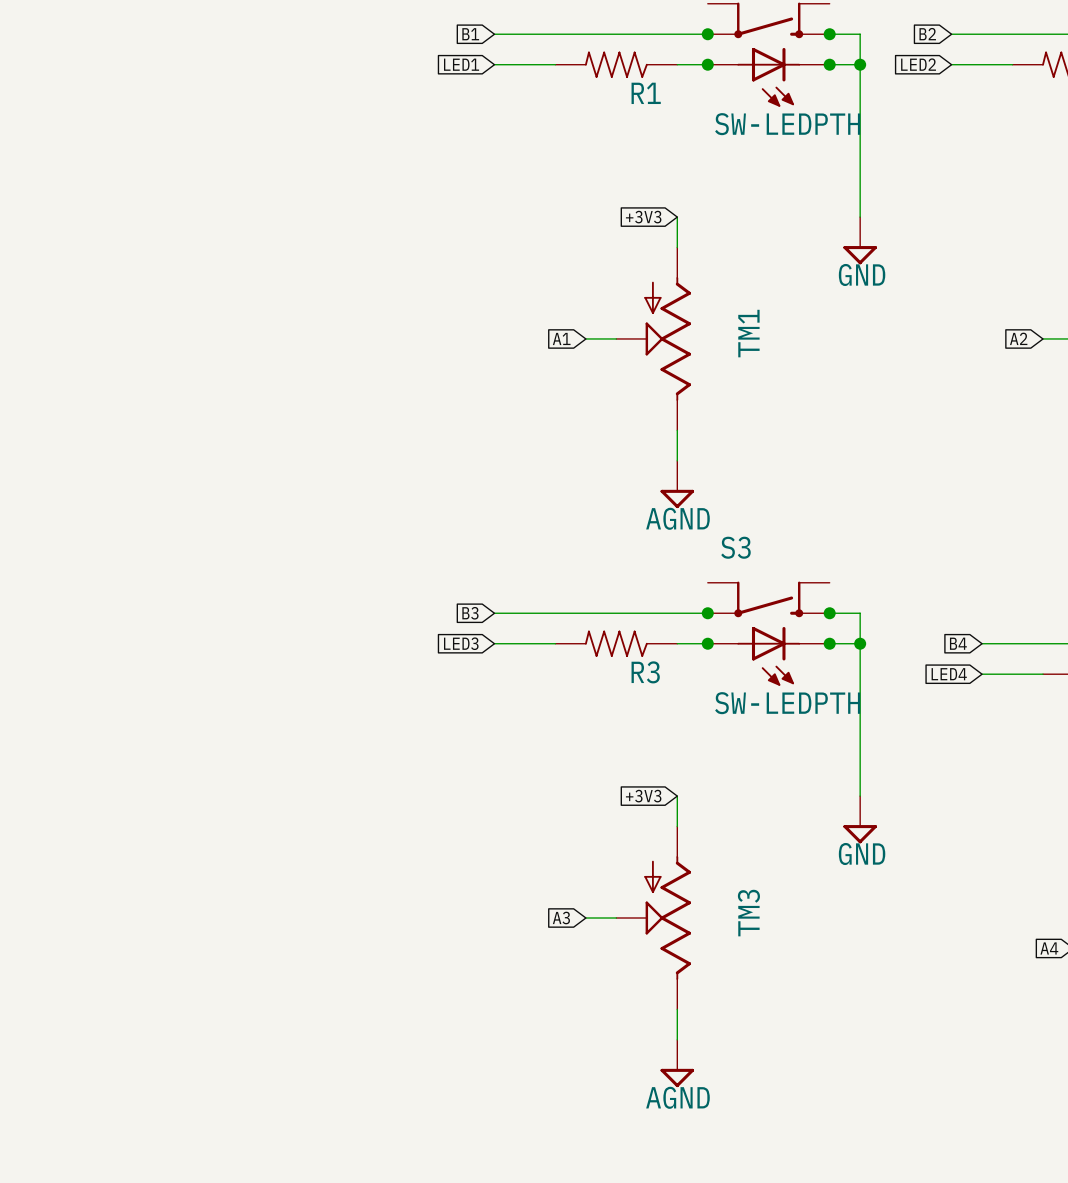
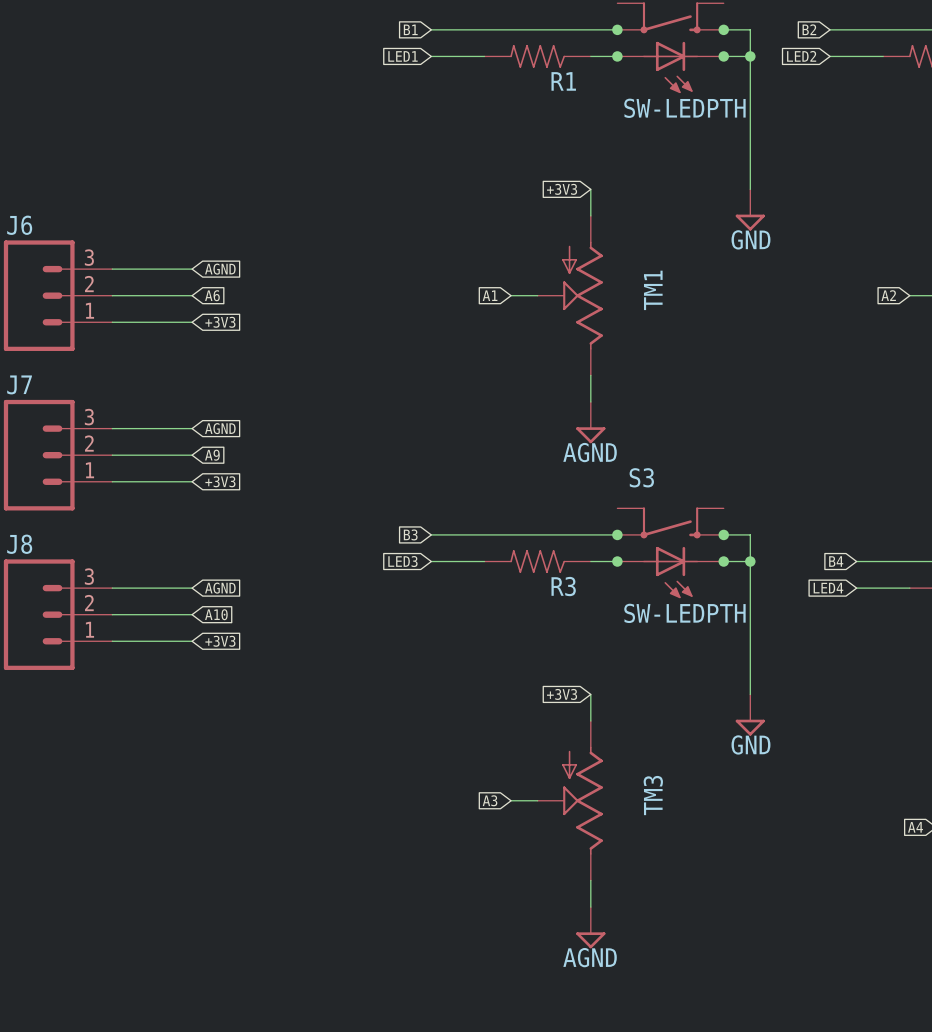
wire: none -> (112, 269) (192, 269)
global label: none -> AGND (220, 269)
J6: none -> (58, 295)
wire: none -> (112, 295) (192, 295)
global label: none -> A6 (212, 295)
wire: none -> (112, 322) (192, 322)
global label: none -> +3V3 (220, 322)
wire: none -> (112, 428) (192, 428)
global label: none -> AGND (220, 428)
J7: none -> (58, 455)
wire: none -> (112, 455) (192, 455)
global label: none -> A9 (212, 455)
wire: none -> (112, 481) (192, 481)
global label: none -> +3V3 (220, 481)
wire: none -> (112, 588) (192, 588)
global label: none -> AGND (220, 588)
J8: none -> (58, 614)
wire: none -> (112, 614) (192, 614)
global label: none -> A10 (216, 614)
wire: none -> (112, 641) (192, 641)
global label: none -> +3V3 (220, 641)

